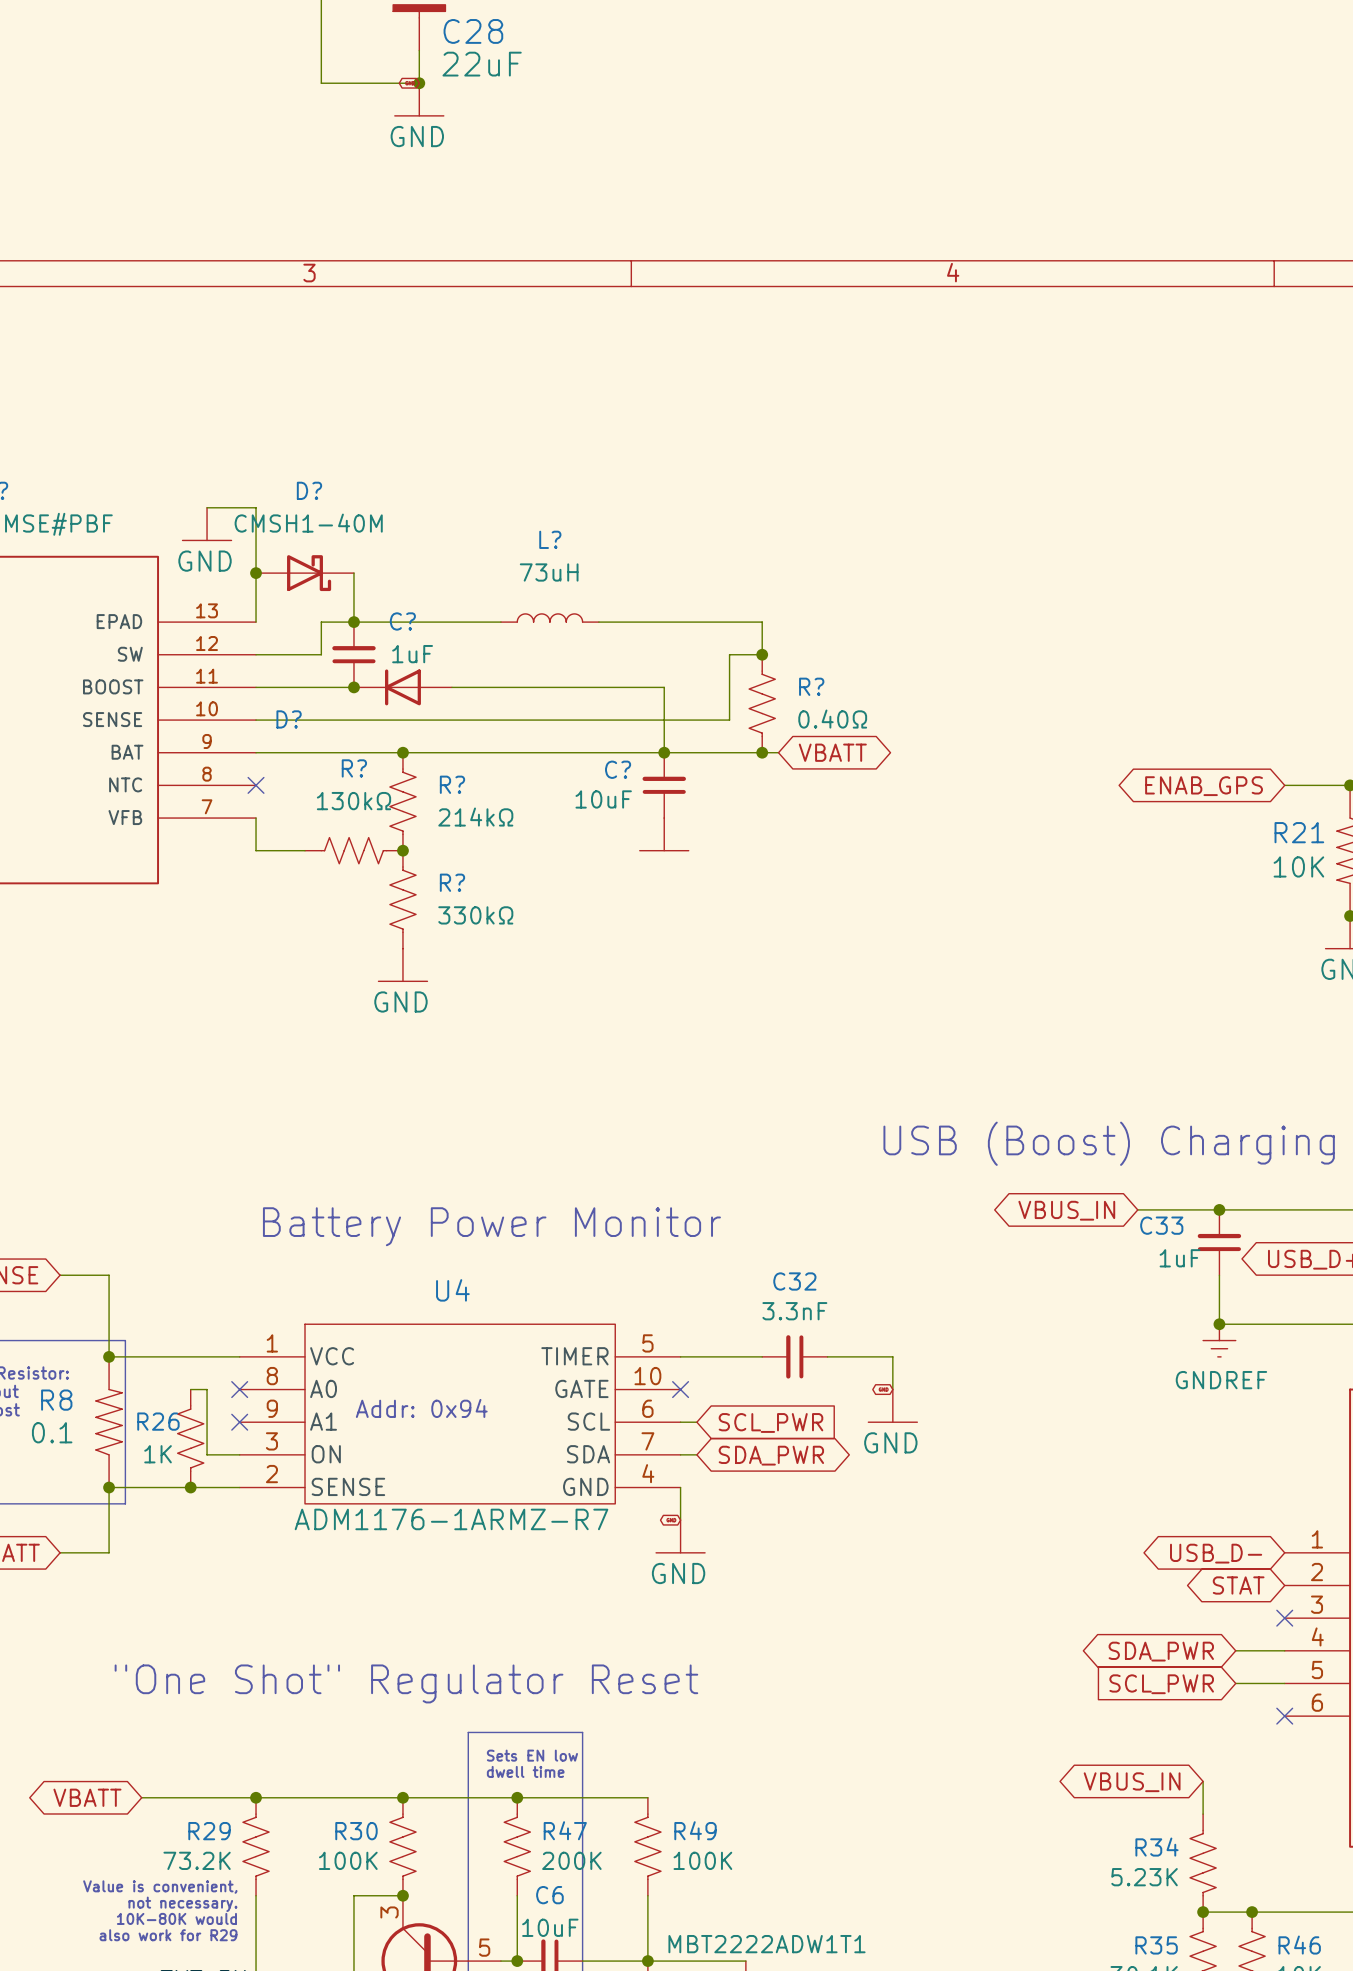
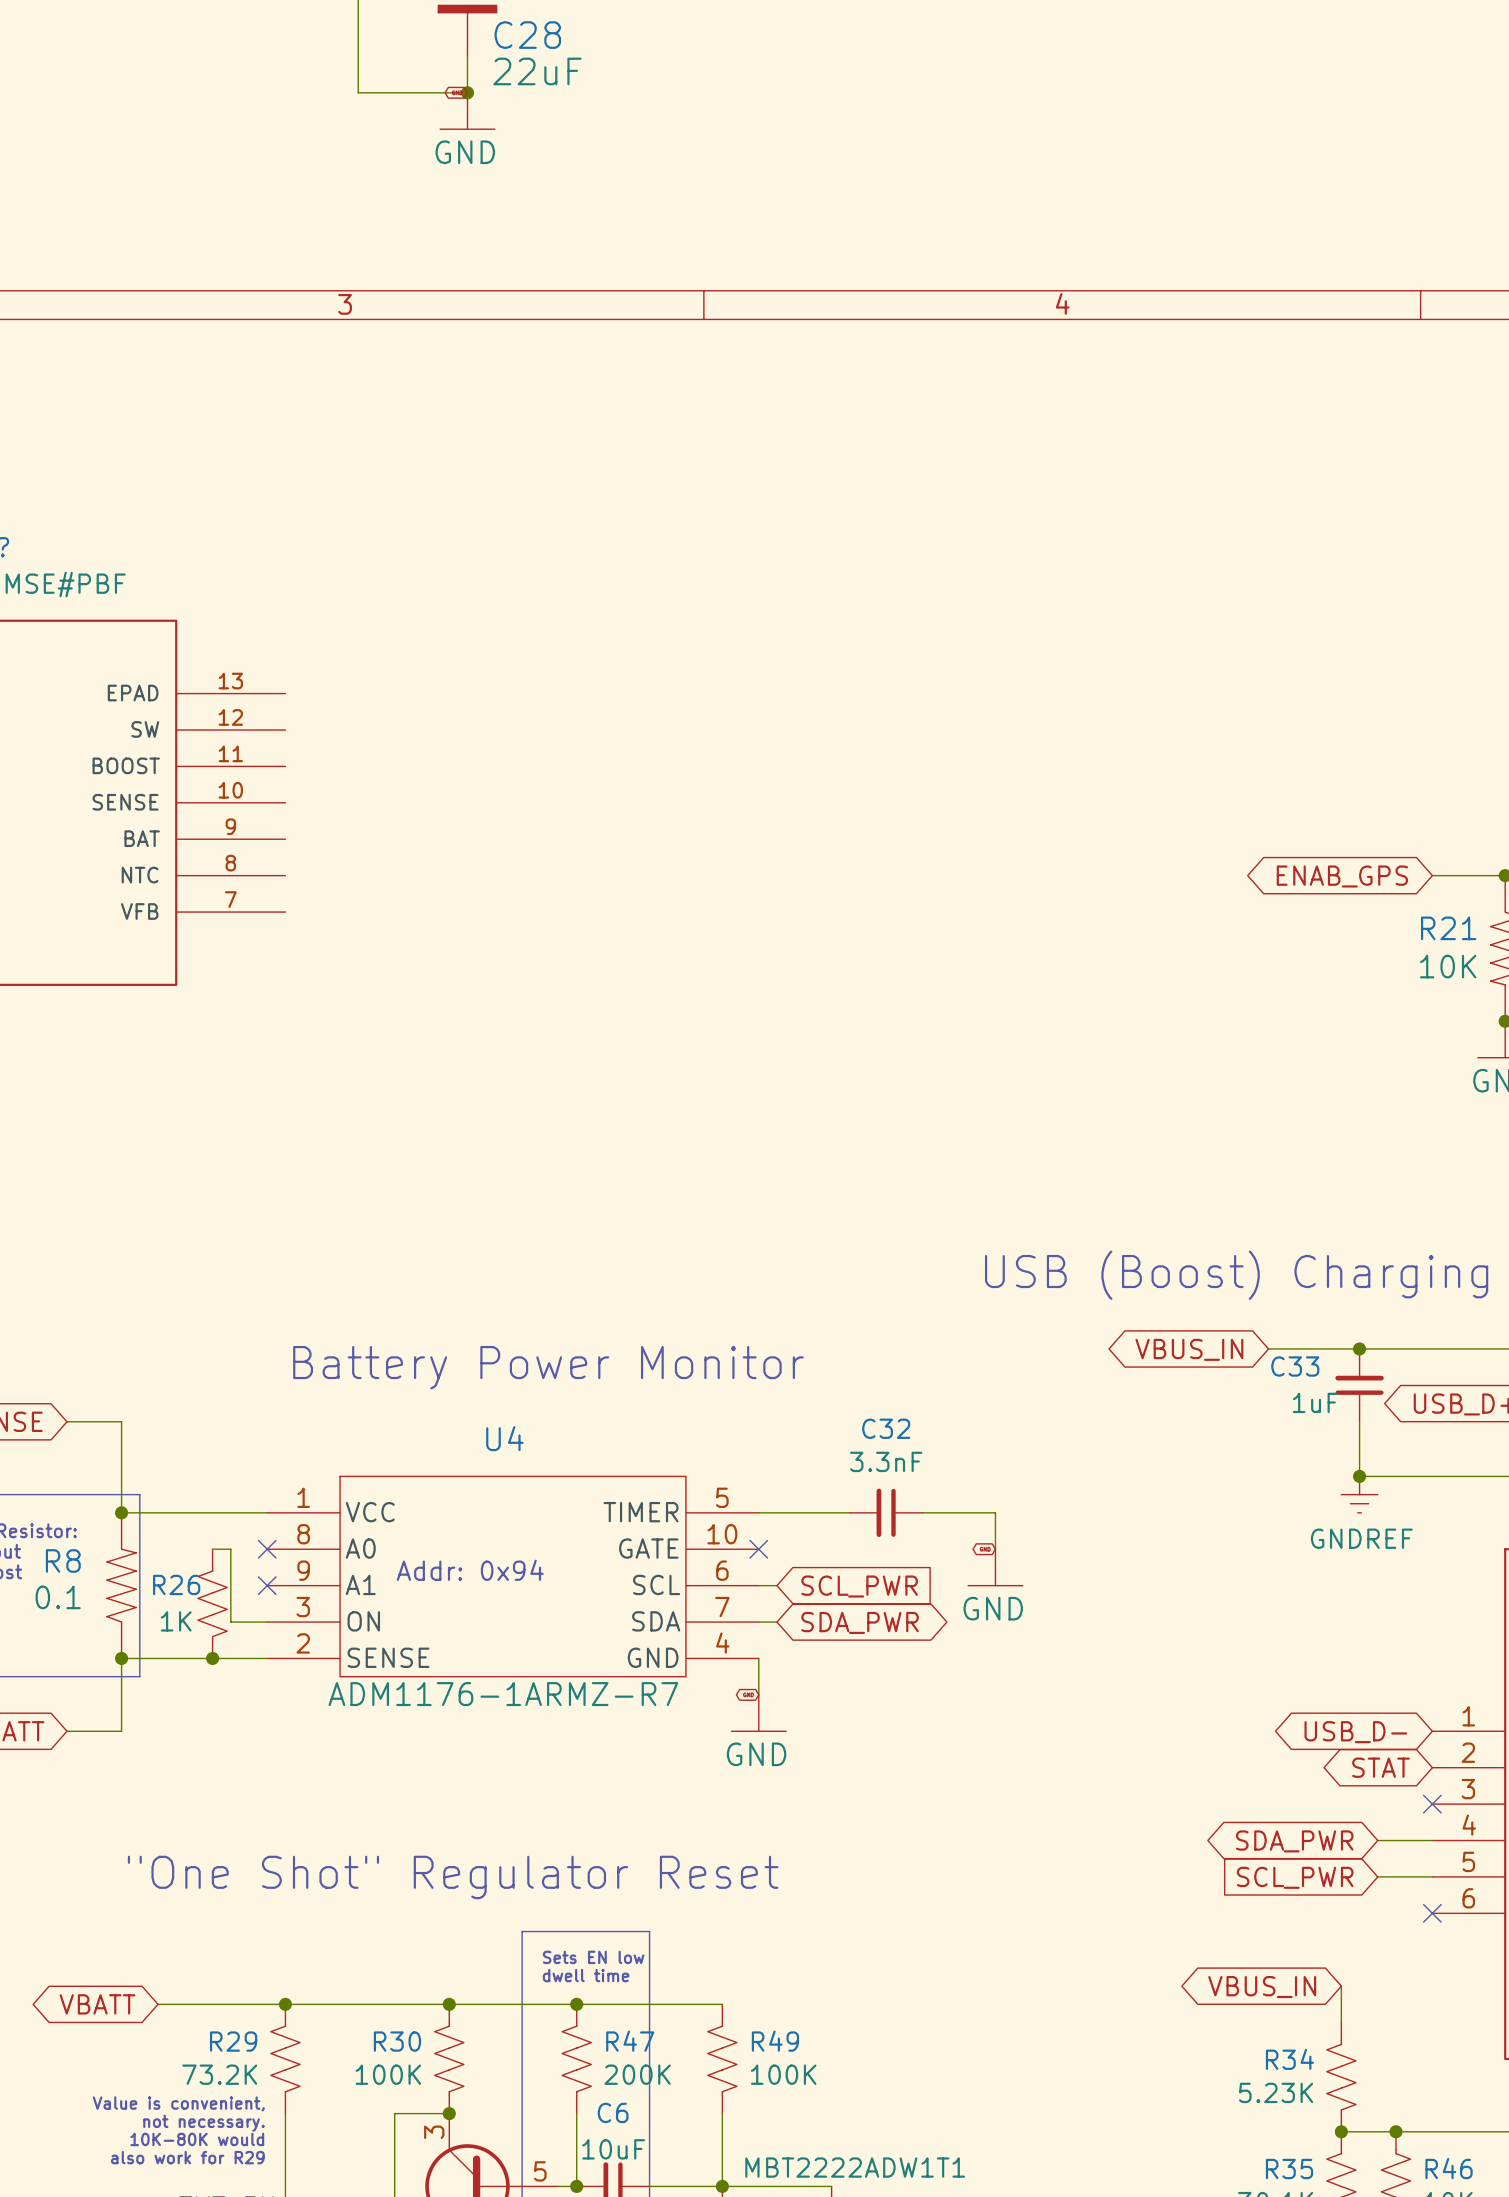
wire: (207, 507) (256, 507) (256, 622) -> none
power symbol: GND (207, 524) -> none
junction: (256, 573) -> none
D?: CMSH1-40M (305, 573) -> none
wire: (353, 573) (353, 622) -> none
L?: 73uH (549, 618) -> none
junction: (353, 622) -> none
wire: (500, 622) (321, 622) (321, 654) (256, 654) -> none
wire: (598, 622) (762, 622) (762, 654) (729, 654) (729, 720) (256, 720) -> none
C?: 1uF (353, 654) -> none
junction: (762, 654) -> none
wire: (256, 687) (353, 687) -> none
junction: (353, 687) -> none
D?: (402, 687) -> none
wire: (451, 687) (664, 687) (664, 752) -> none
R?: 0.40Ω (762, 703) -> none
wire: (256, 752) (778, 752) -> none
junction: (402, 752) -> none
junction: (664, 752) -> none
junction: (762, 752) -> none
global label: VBATT (832, 752) -> none
no-connect mark: (256, 785) -> none
C?: 10uF (664, 785) -> none
R?: 214kΩ (402, 801) -> none
wire: (256, 818) (256, 850) (305, 850) -> none
power symbol: (664, 834) -> none
R?: 130kΩ (353, 850) -> none
junction: (402, 850) -> none
R?: 330kΩ (402, 899) -> none
power symbol: GND (402, 964) -> none

